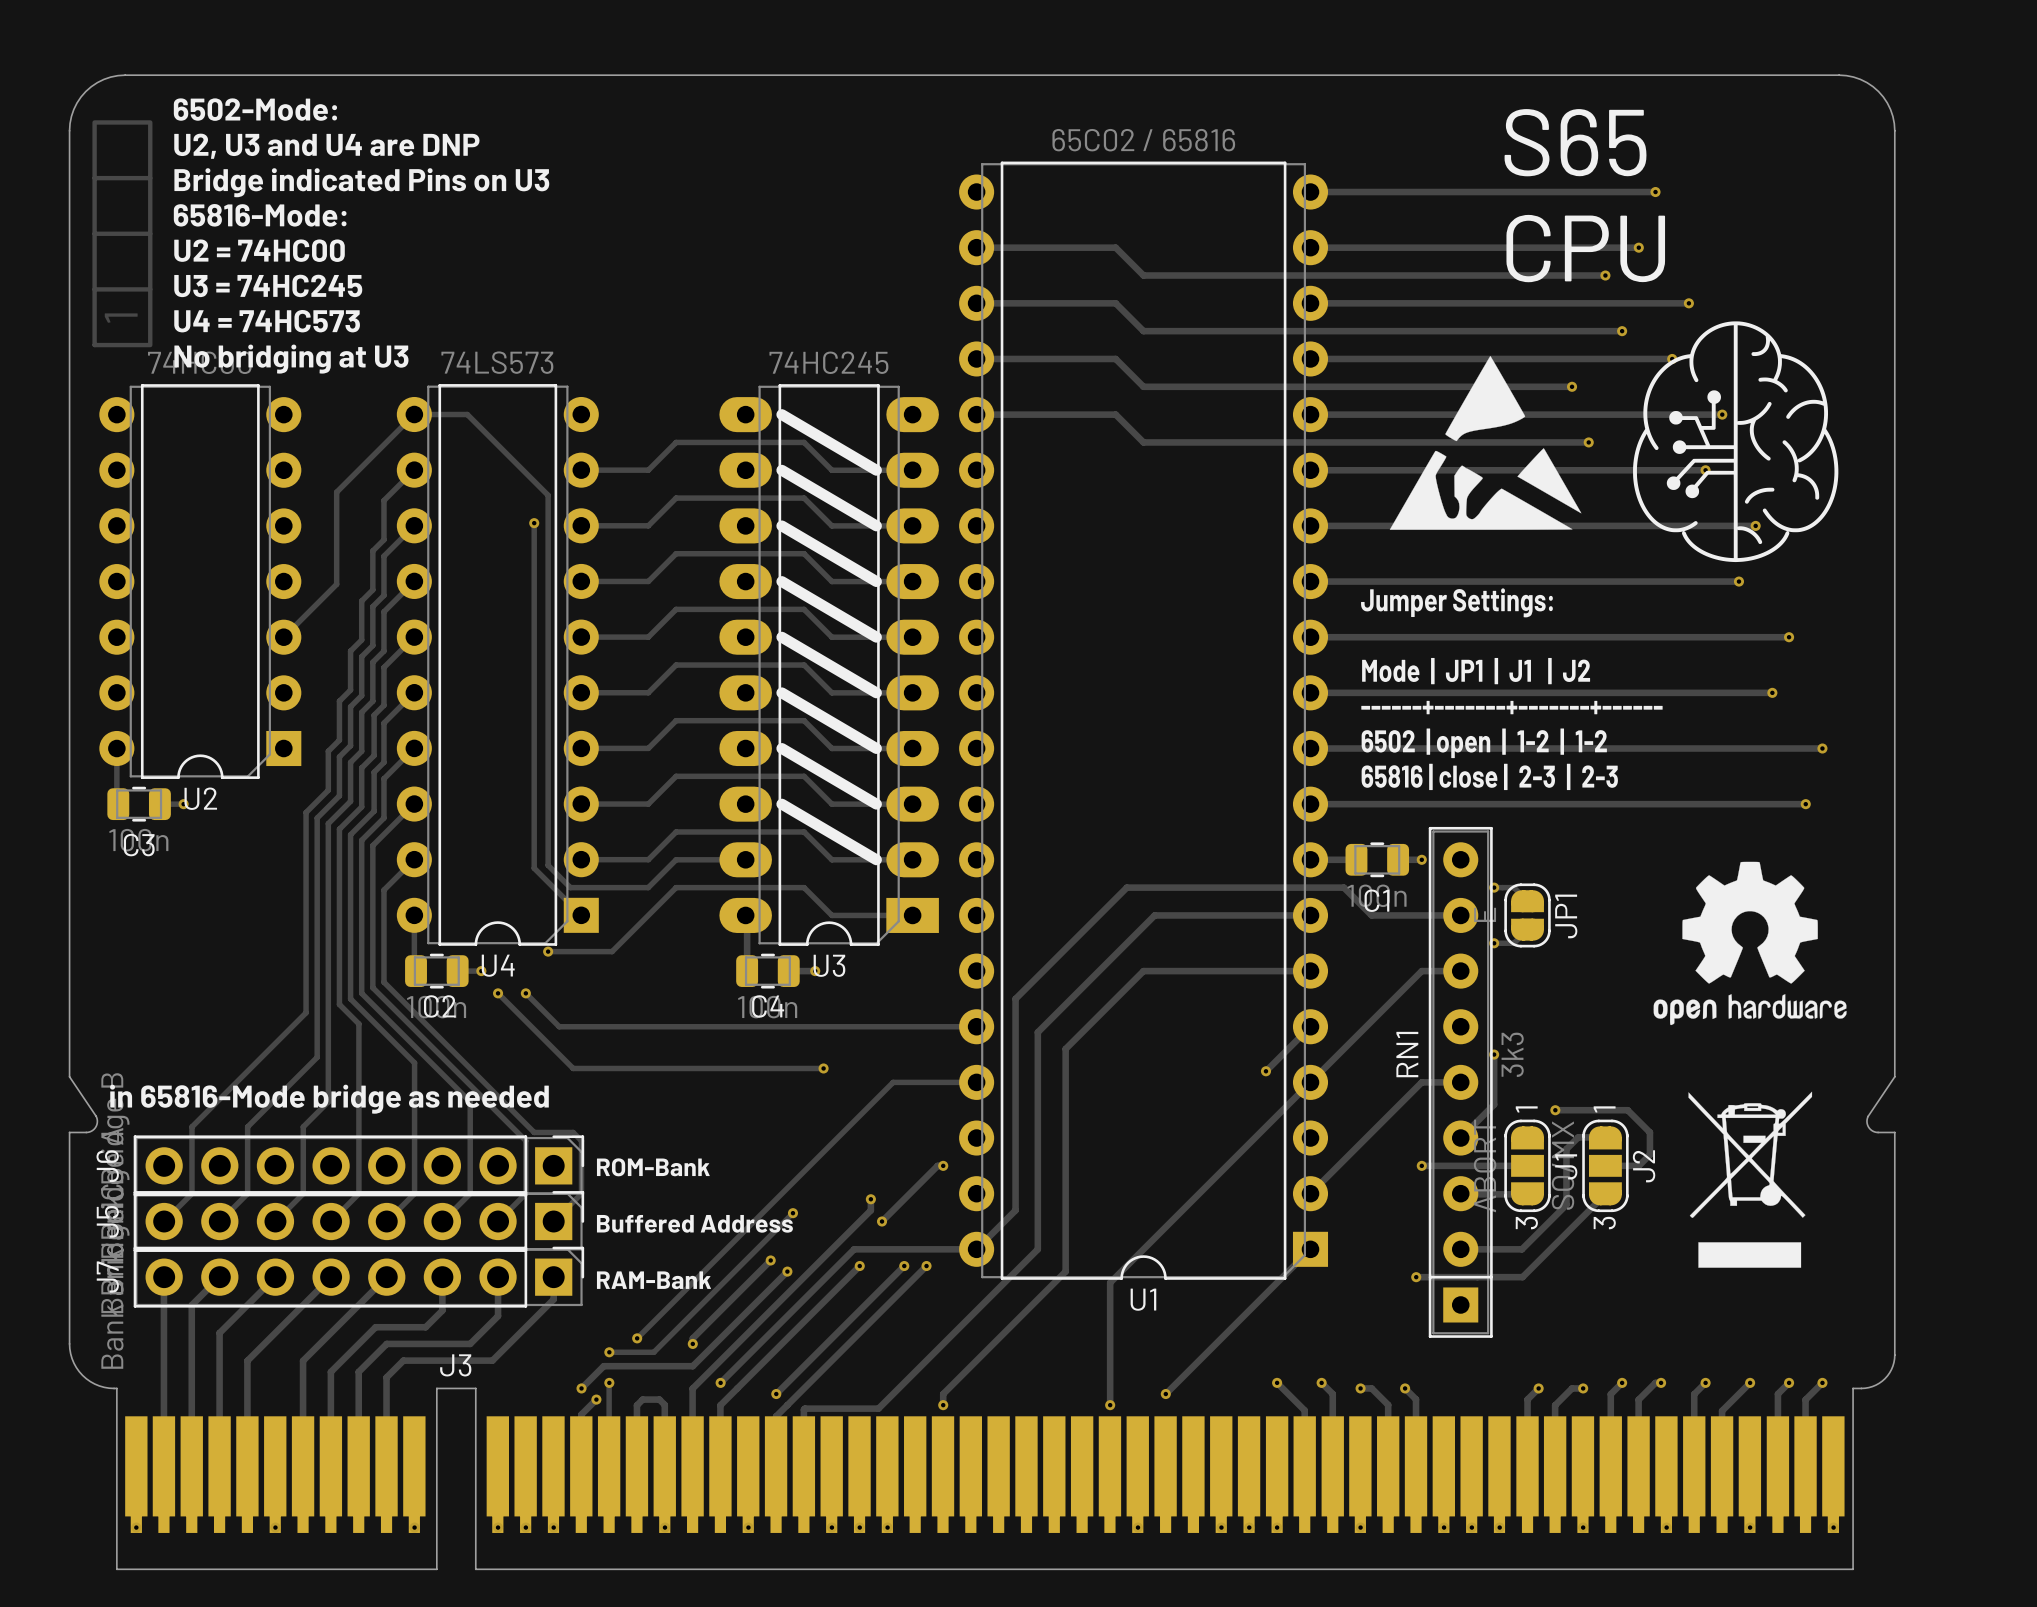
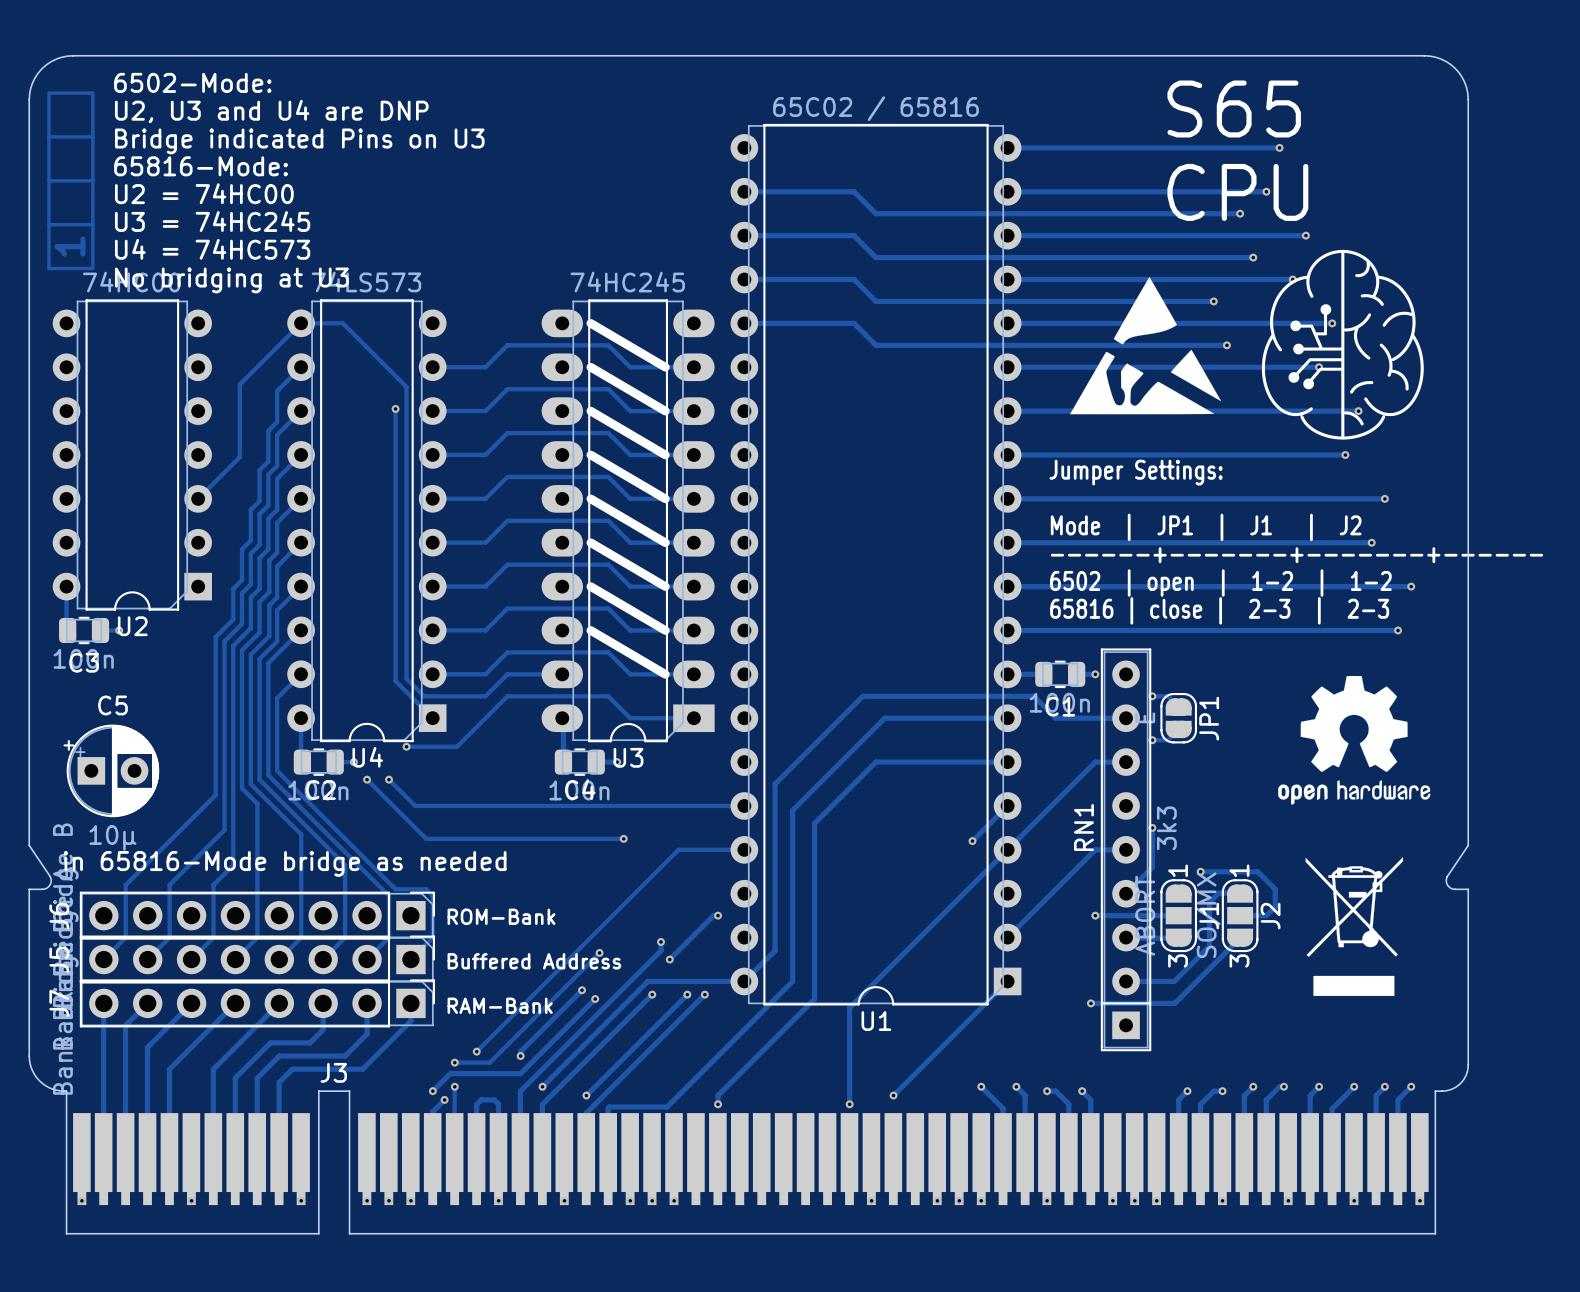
C5: none -> 10µ (111, 770)

